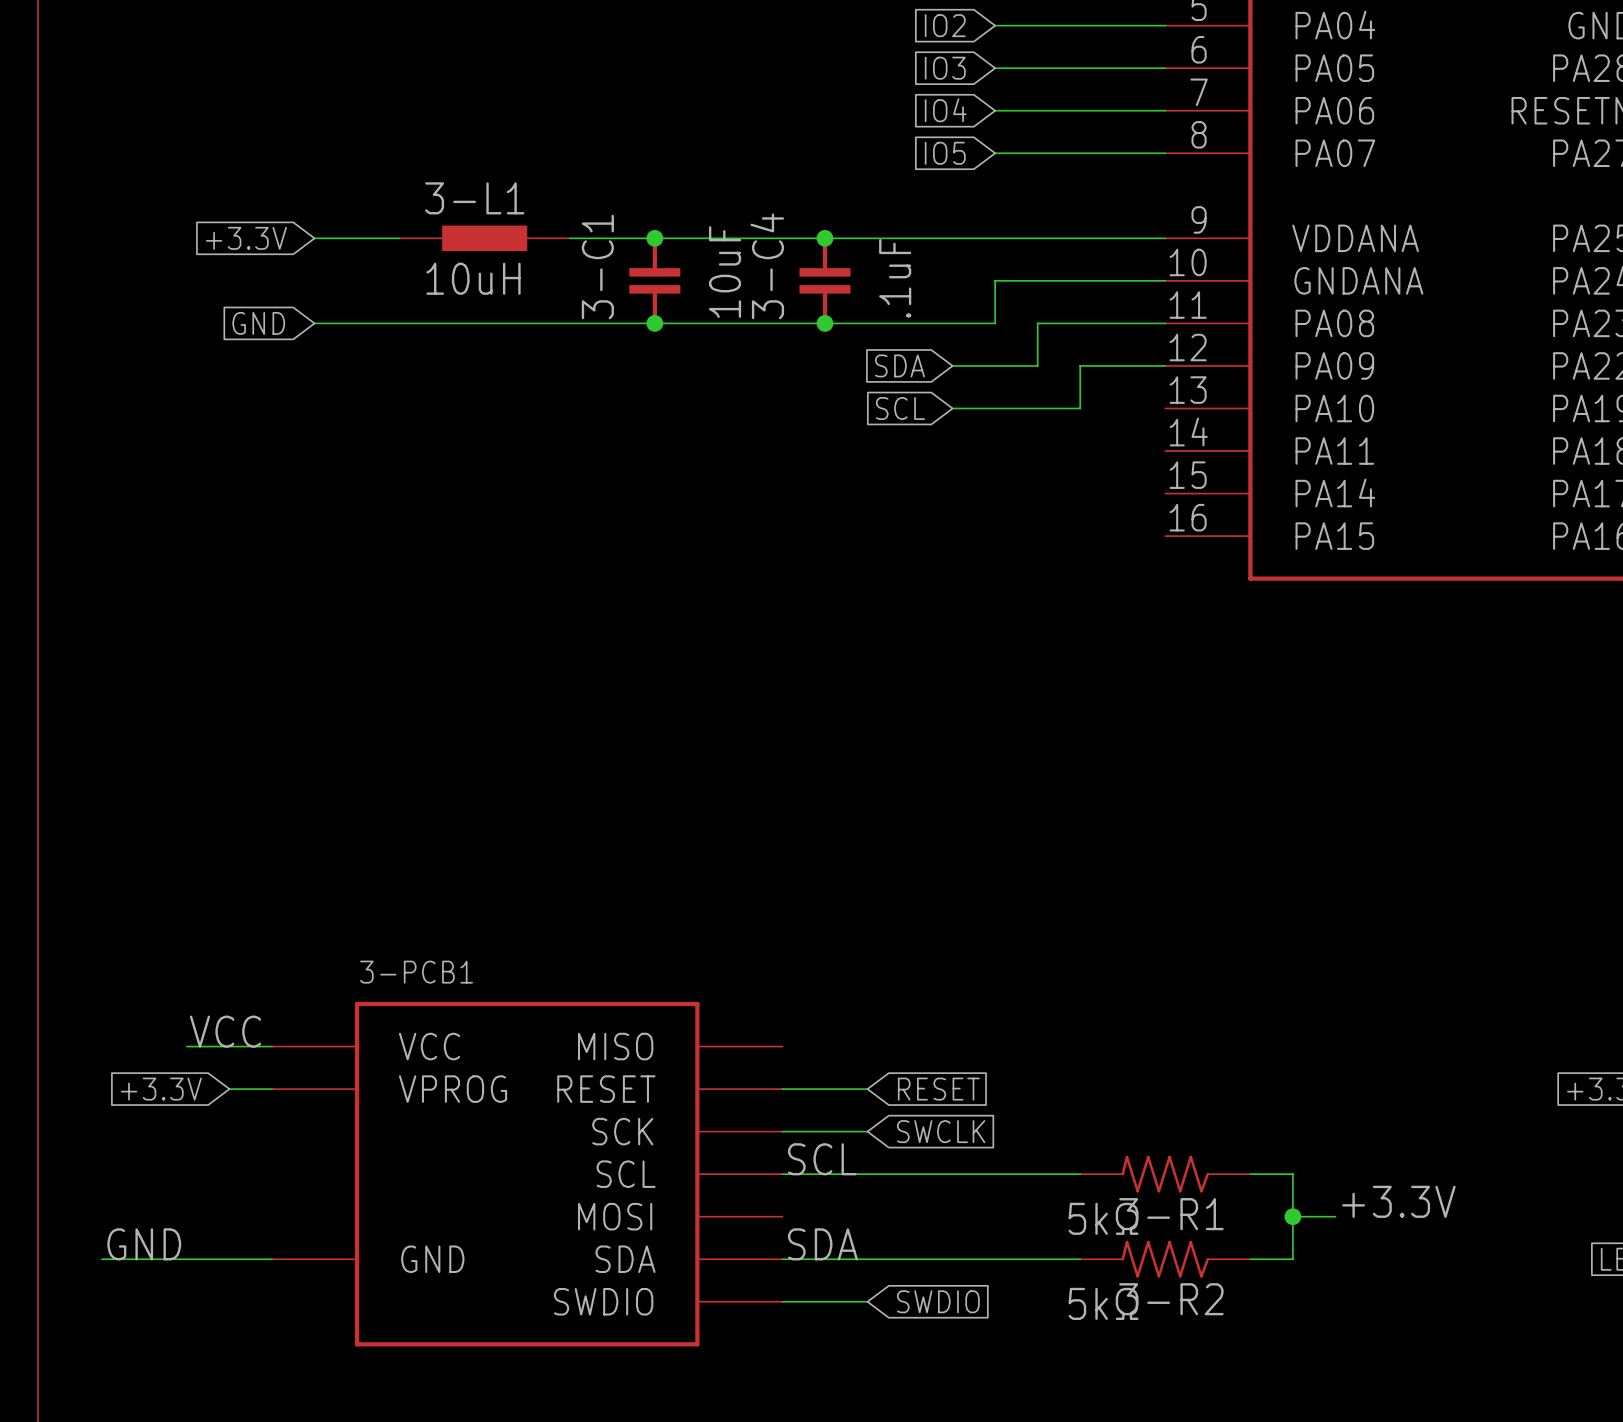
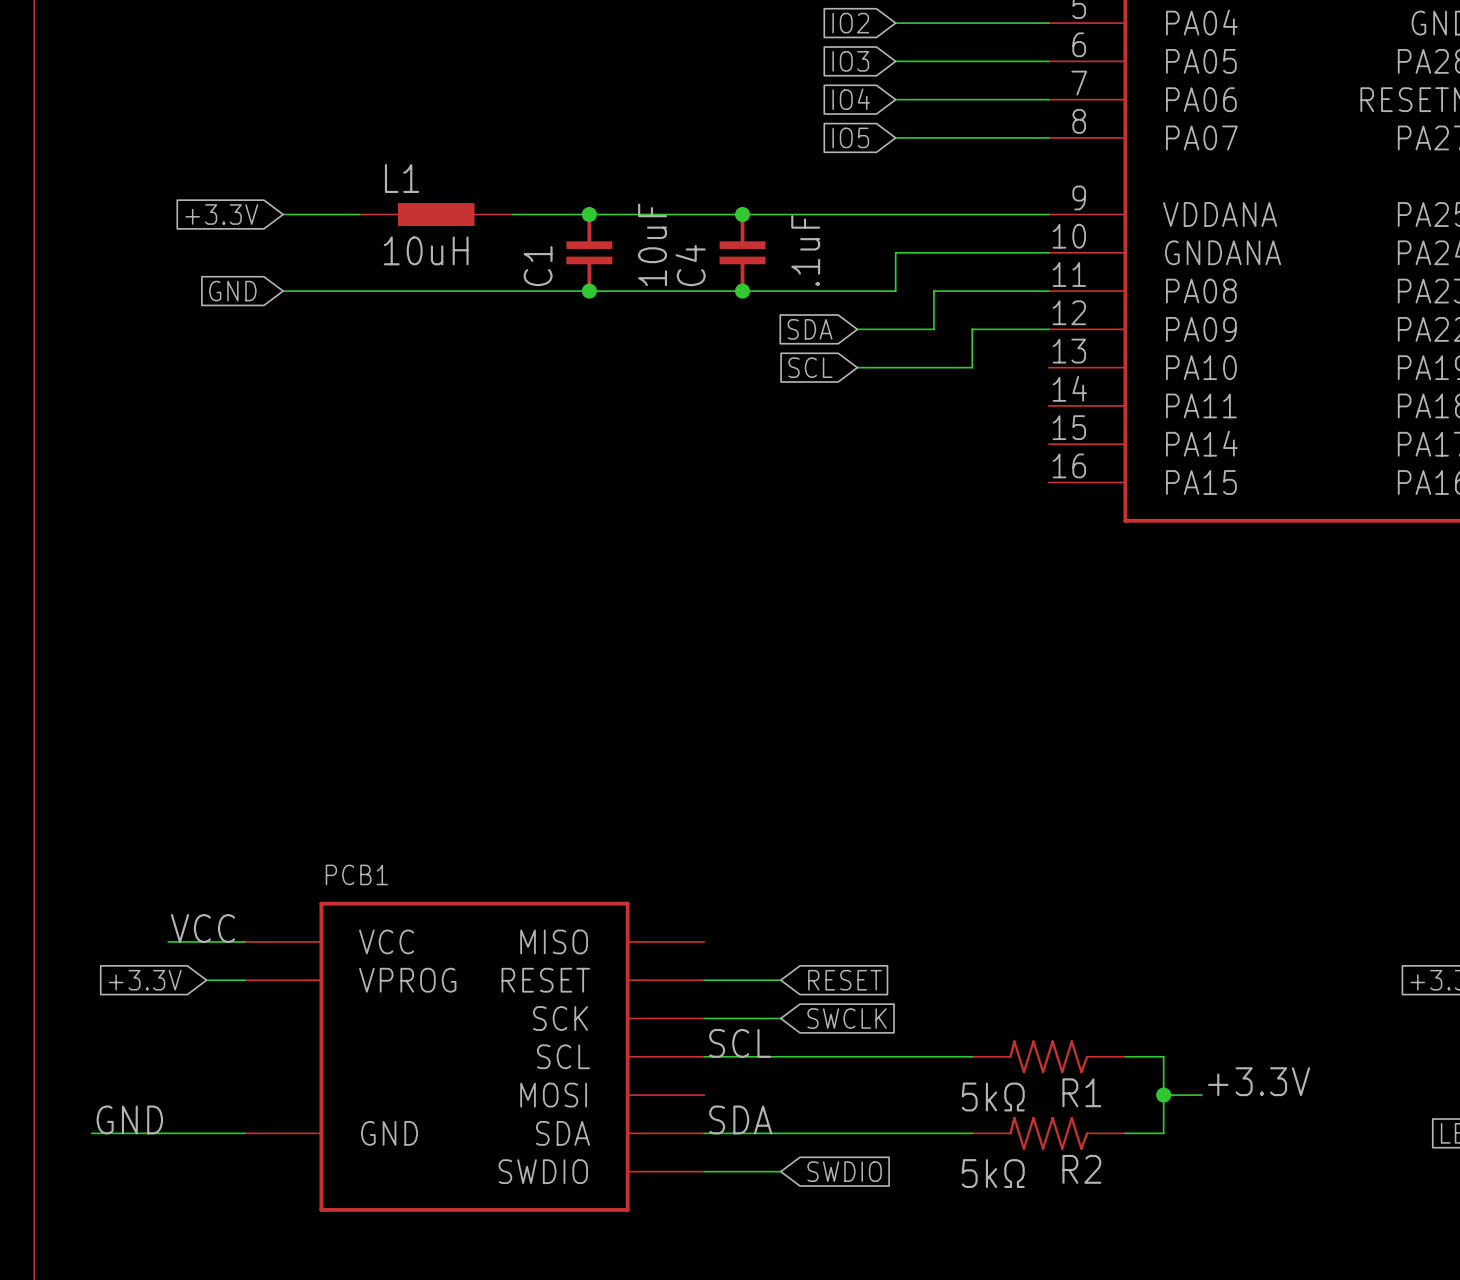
3-L1 name: 3-L1 (474, 198) -> L1 (402, 178)
3-C1 name: 3-C1 (597, 266) -> C1 (538, 266)
3-C4 name: 3-C4 (767, 266) -> C4 (690, 265)
3-PCB1 name: 3-PCB1 (416, 972) -> PCB1 (356, 874)
3-R1 name: 3-R1 (1171, 1214) -> R1 (1081, 1092)
3-R2 name: 3-R2 (1171, 1299) -> R2 (1081, 1169)

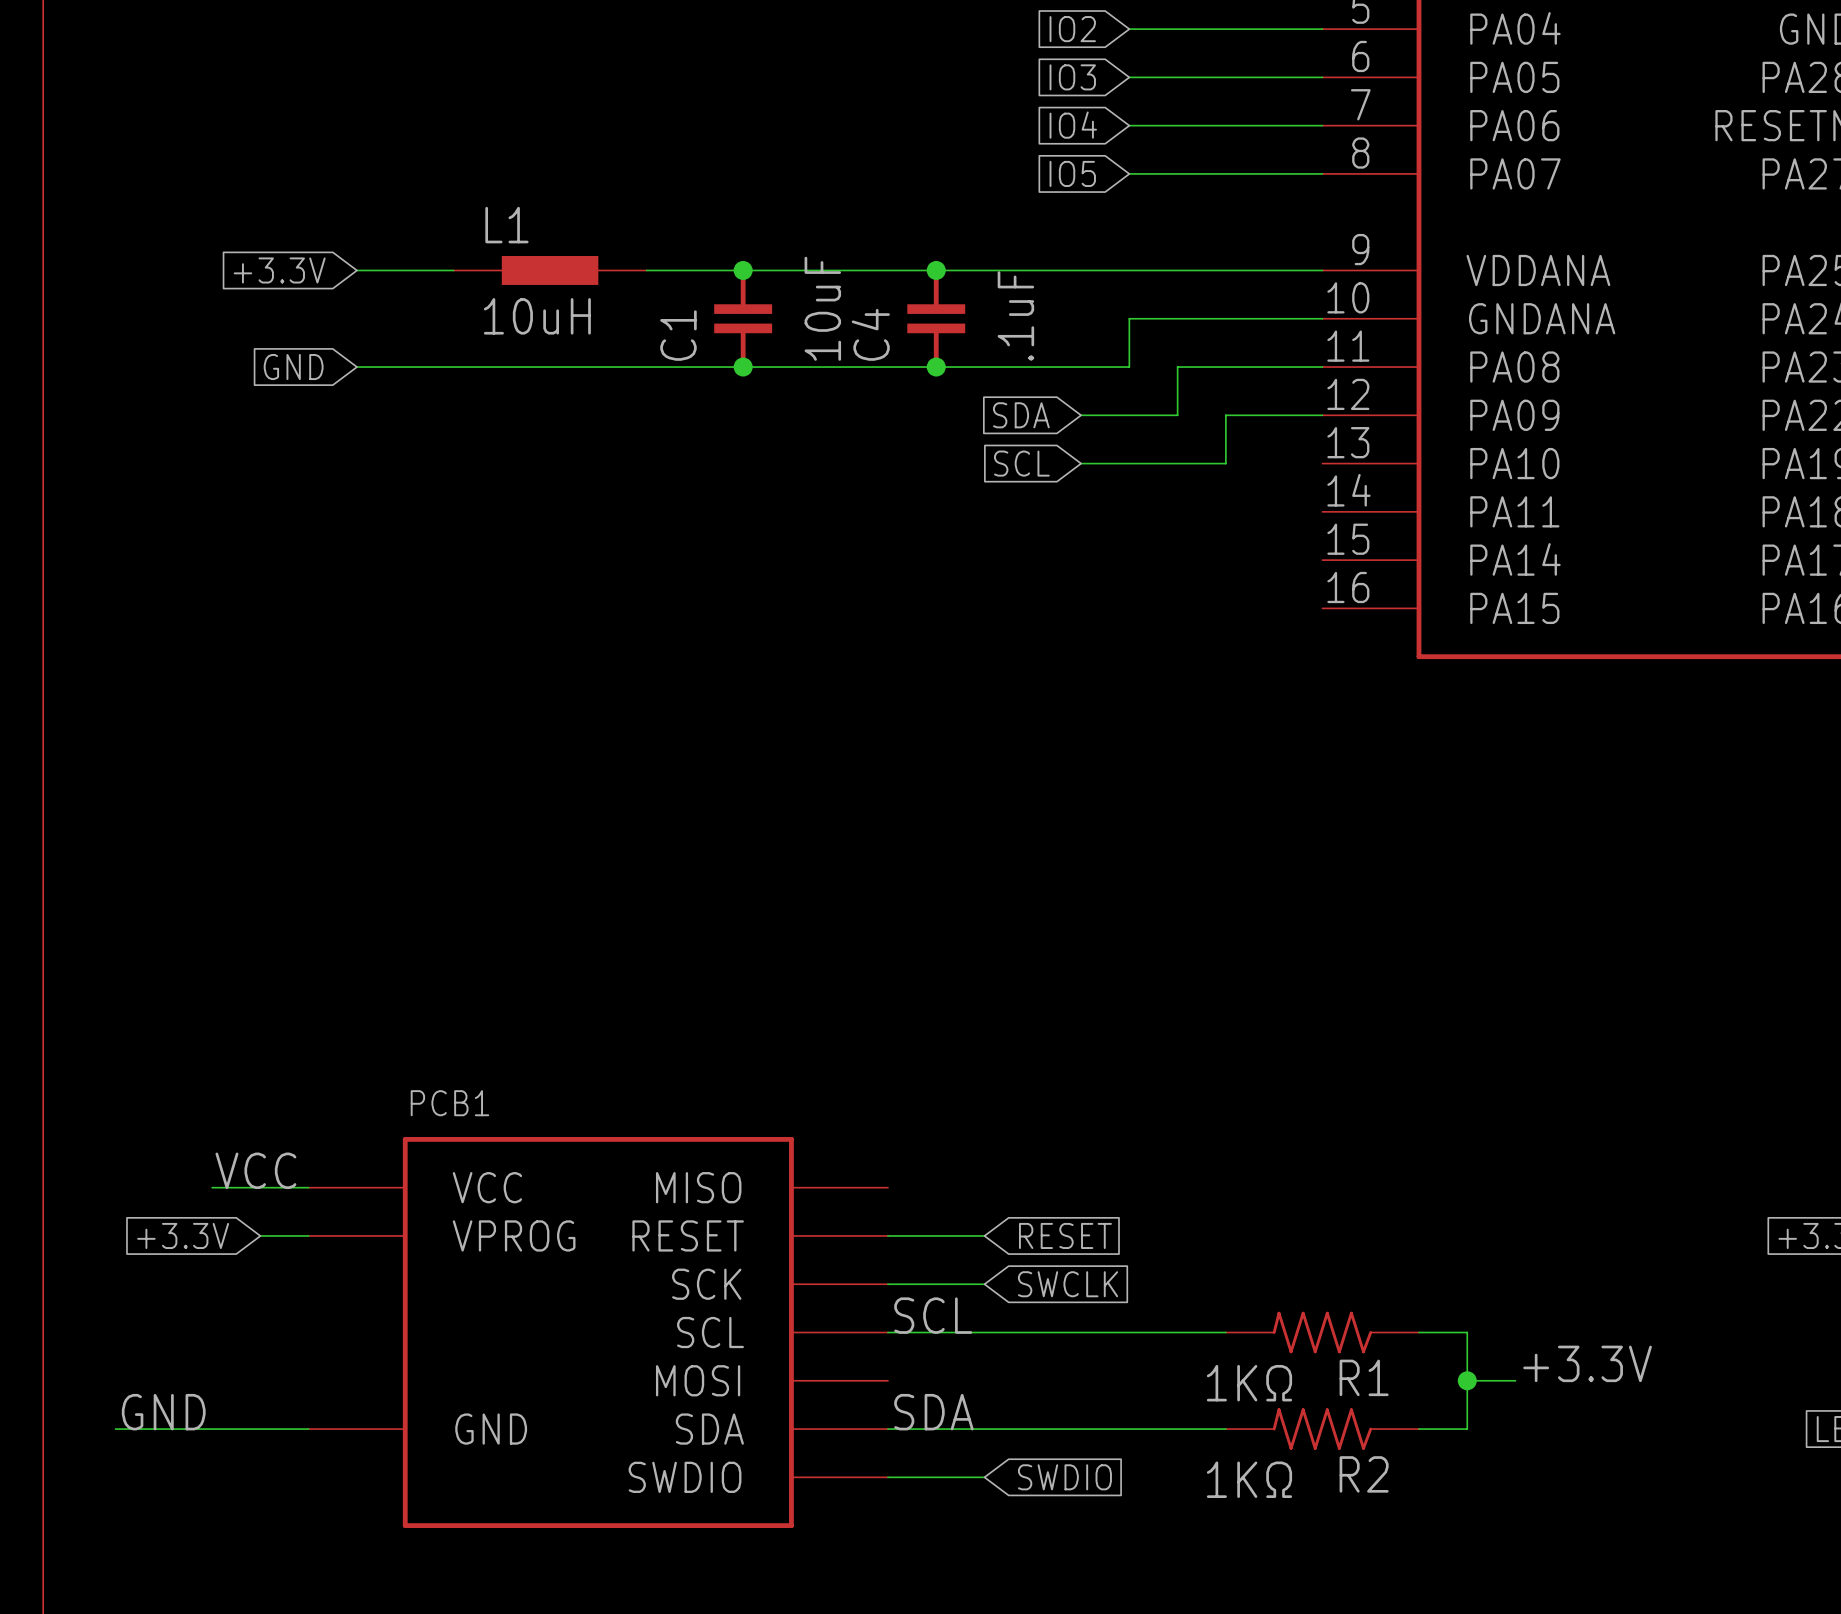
R1 value: 5kΩ (993, 1096) -> 1KΩ (1249, 1383)
R2 value: 5kΩ (993, 1173) -> 1KΩ (1249, 1479)

